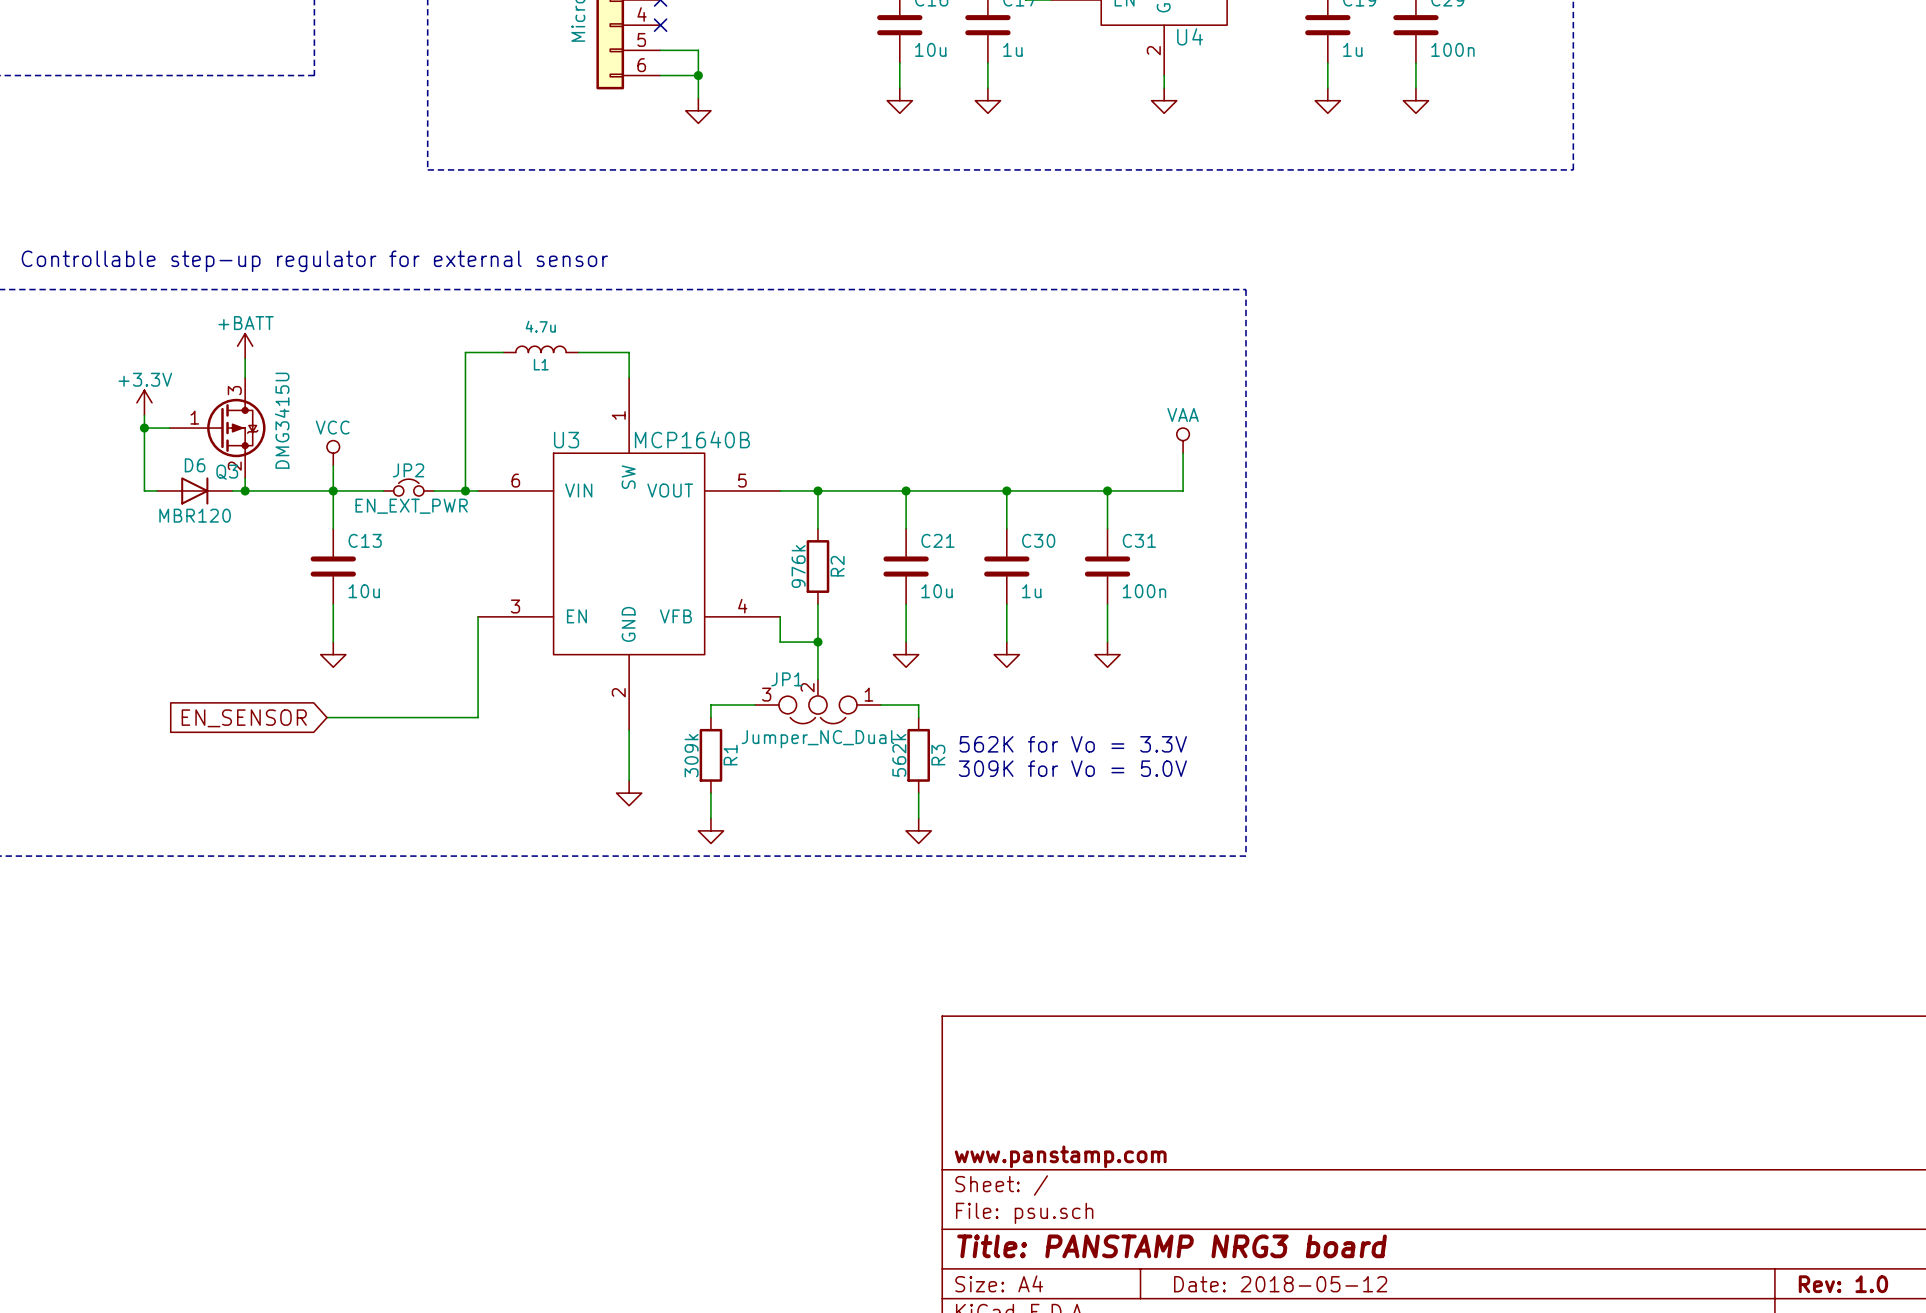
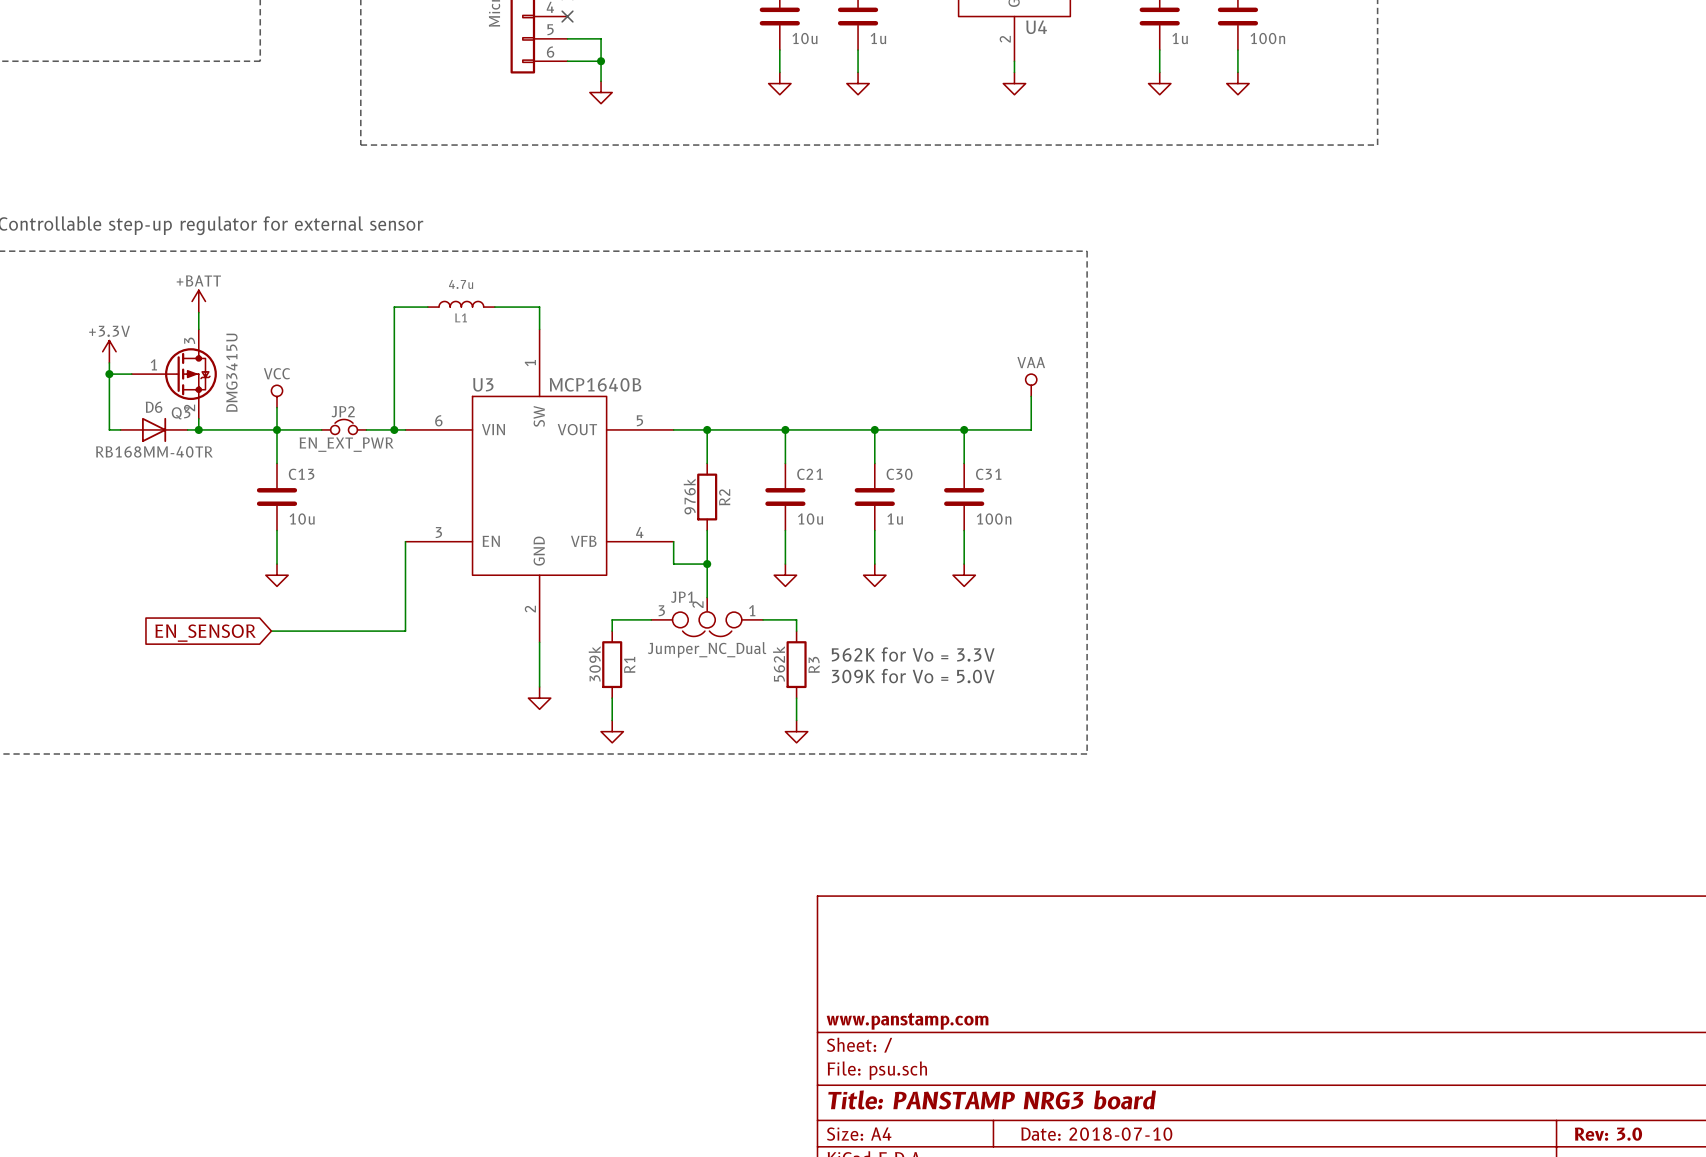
D6 value: MBR120 (195, 515) -> RB168MM-40TR (154, 451)
title block: Date: 2018-05-12 (1280, 1284) -> Date: 2018-07-10 (1096, 1134)
title block: Rev: 1.0 (1843, 1284) -> Rev: 3.0 (1608, 1134)

